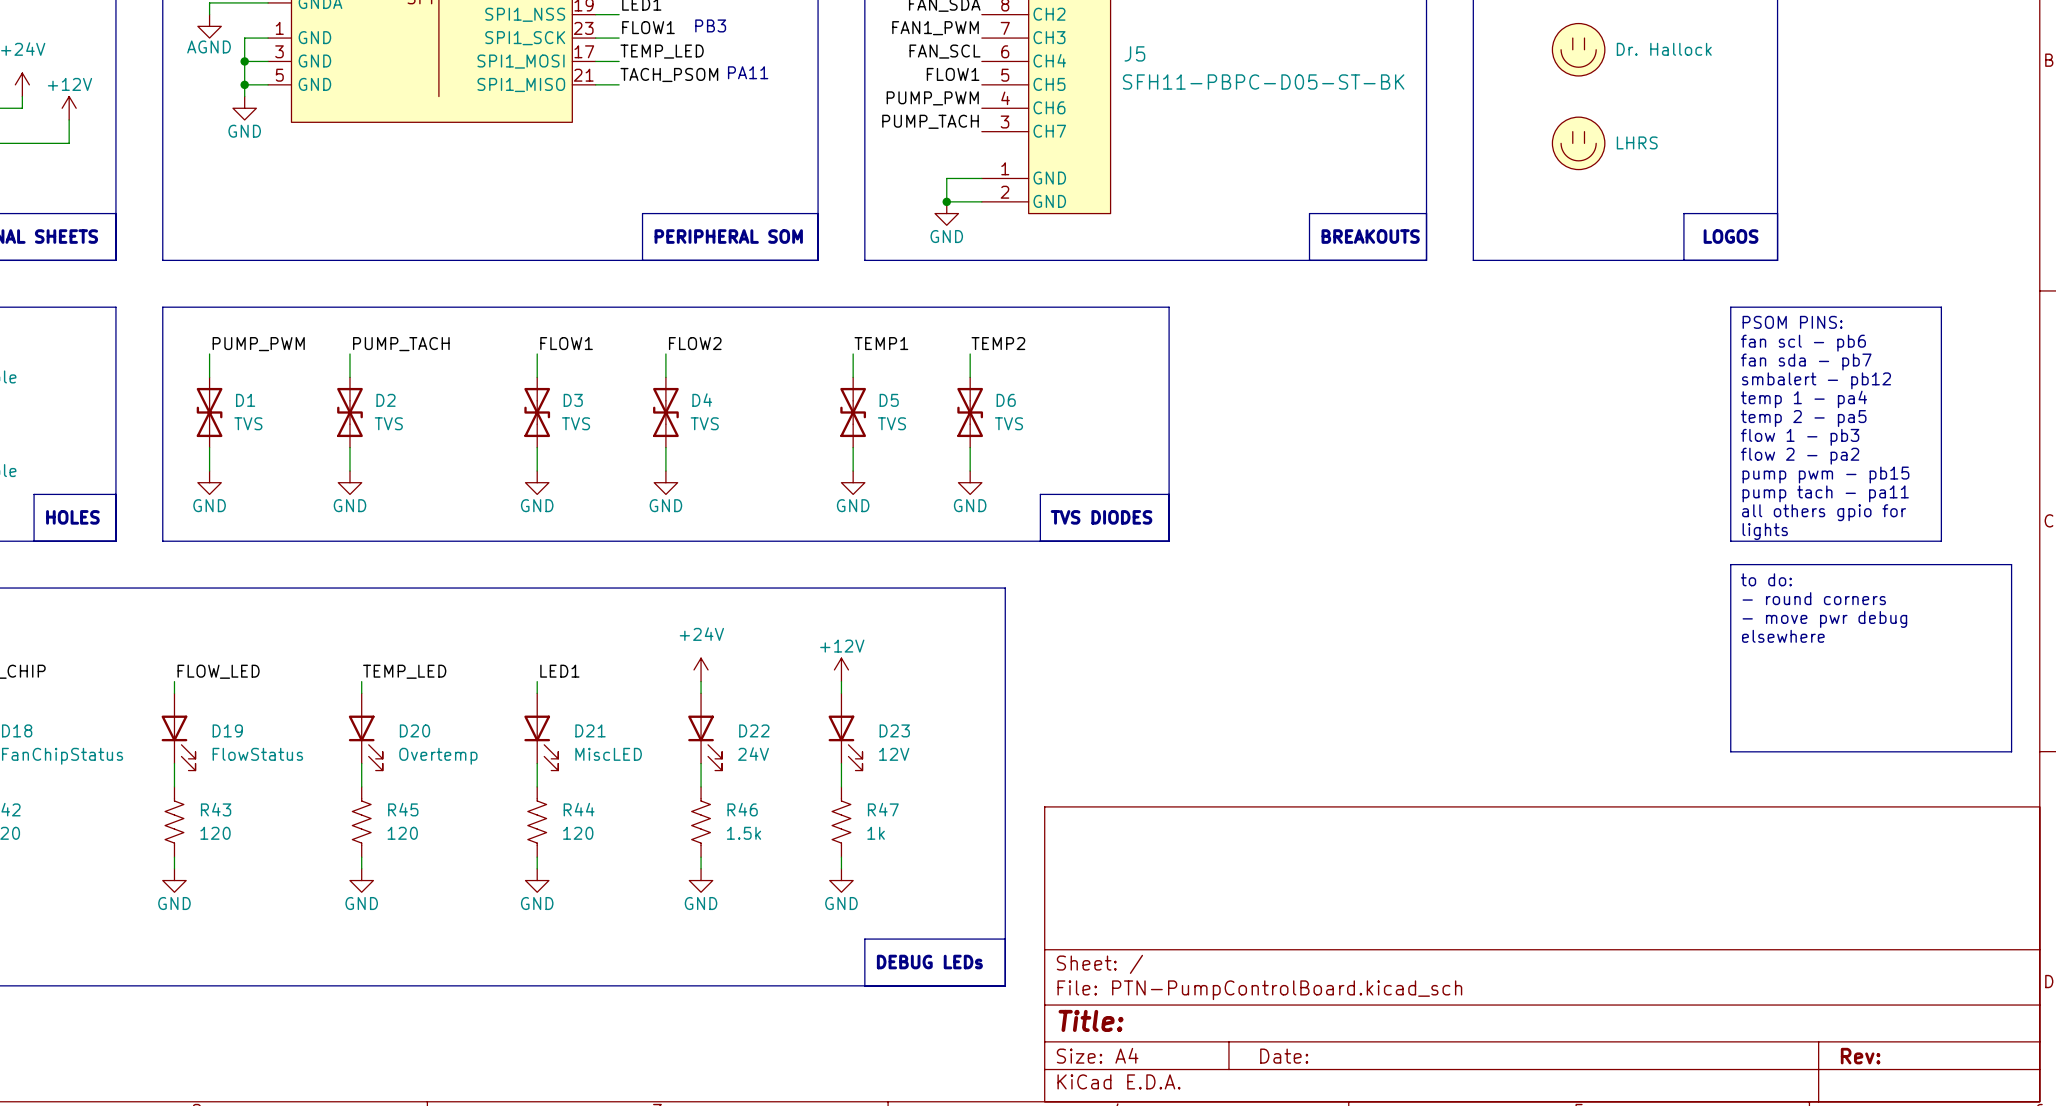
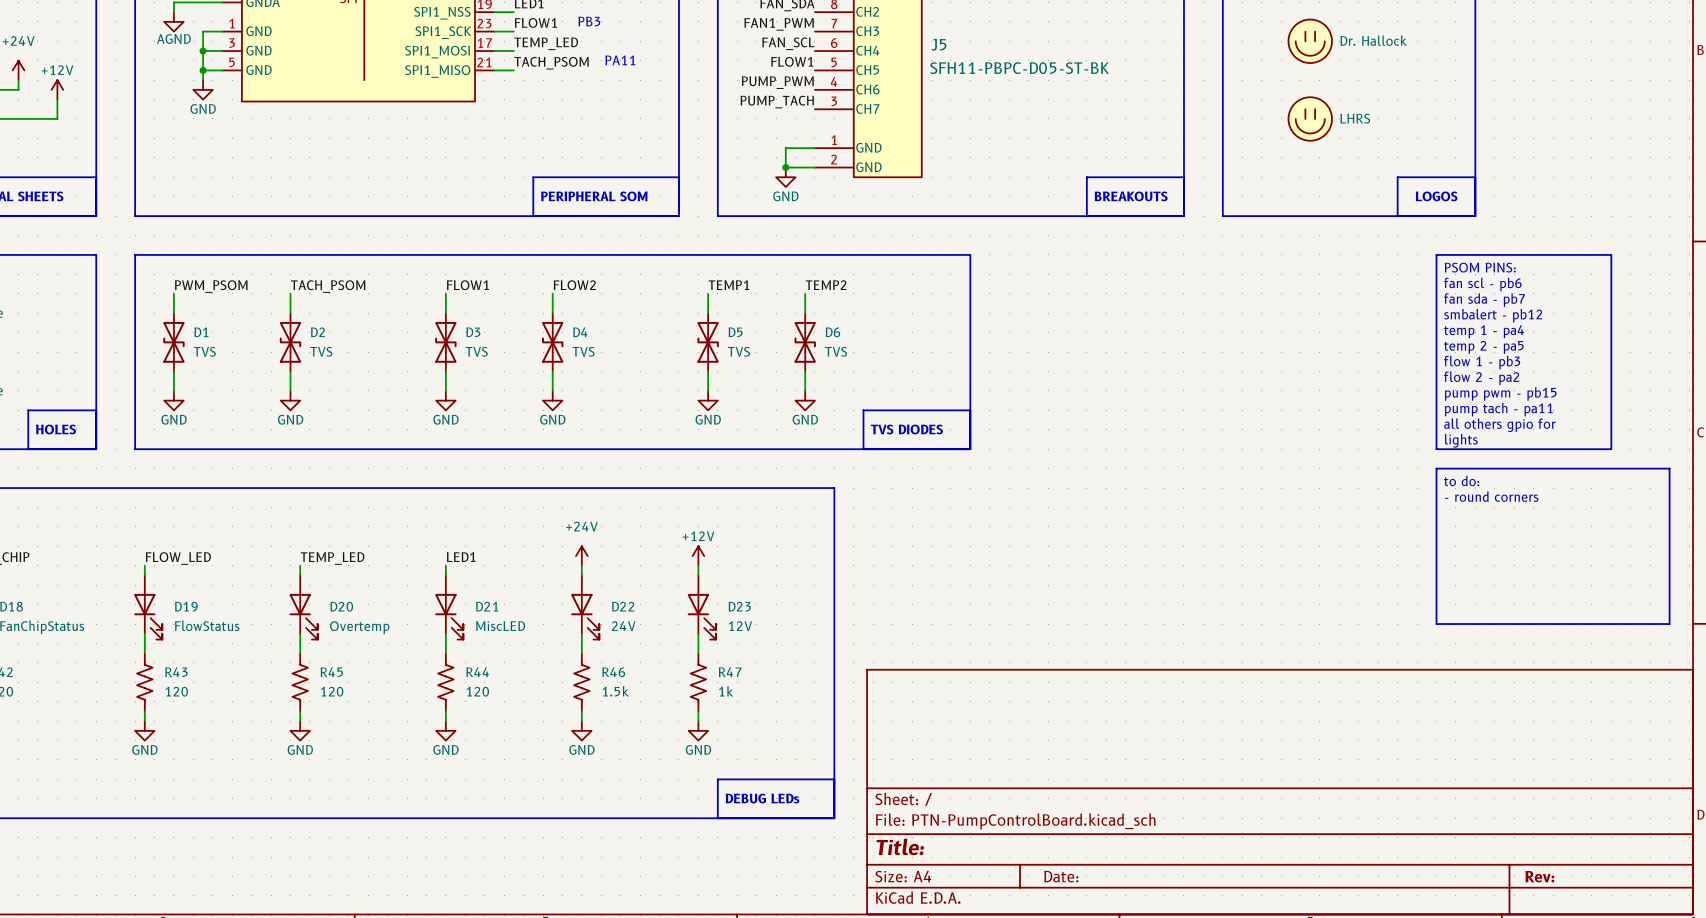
label: PUMP_PWM (258, 344) -> PWM_PSOM (211, 286)
label: PUMP_TACH (401, 344) -> TACH_PSOM (328, 286)
text: - move pwr debug (1824, 619) -> none
text: elsewhere (1783, 636) -> none

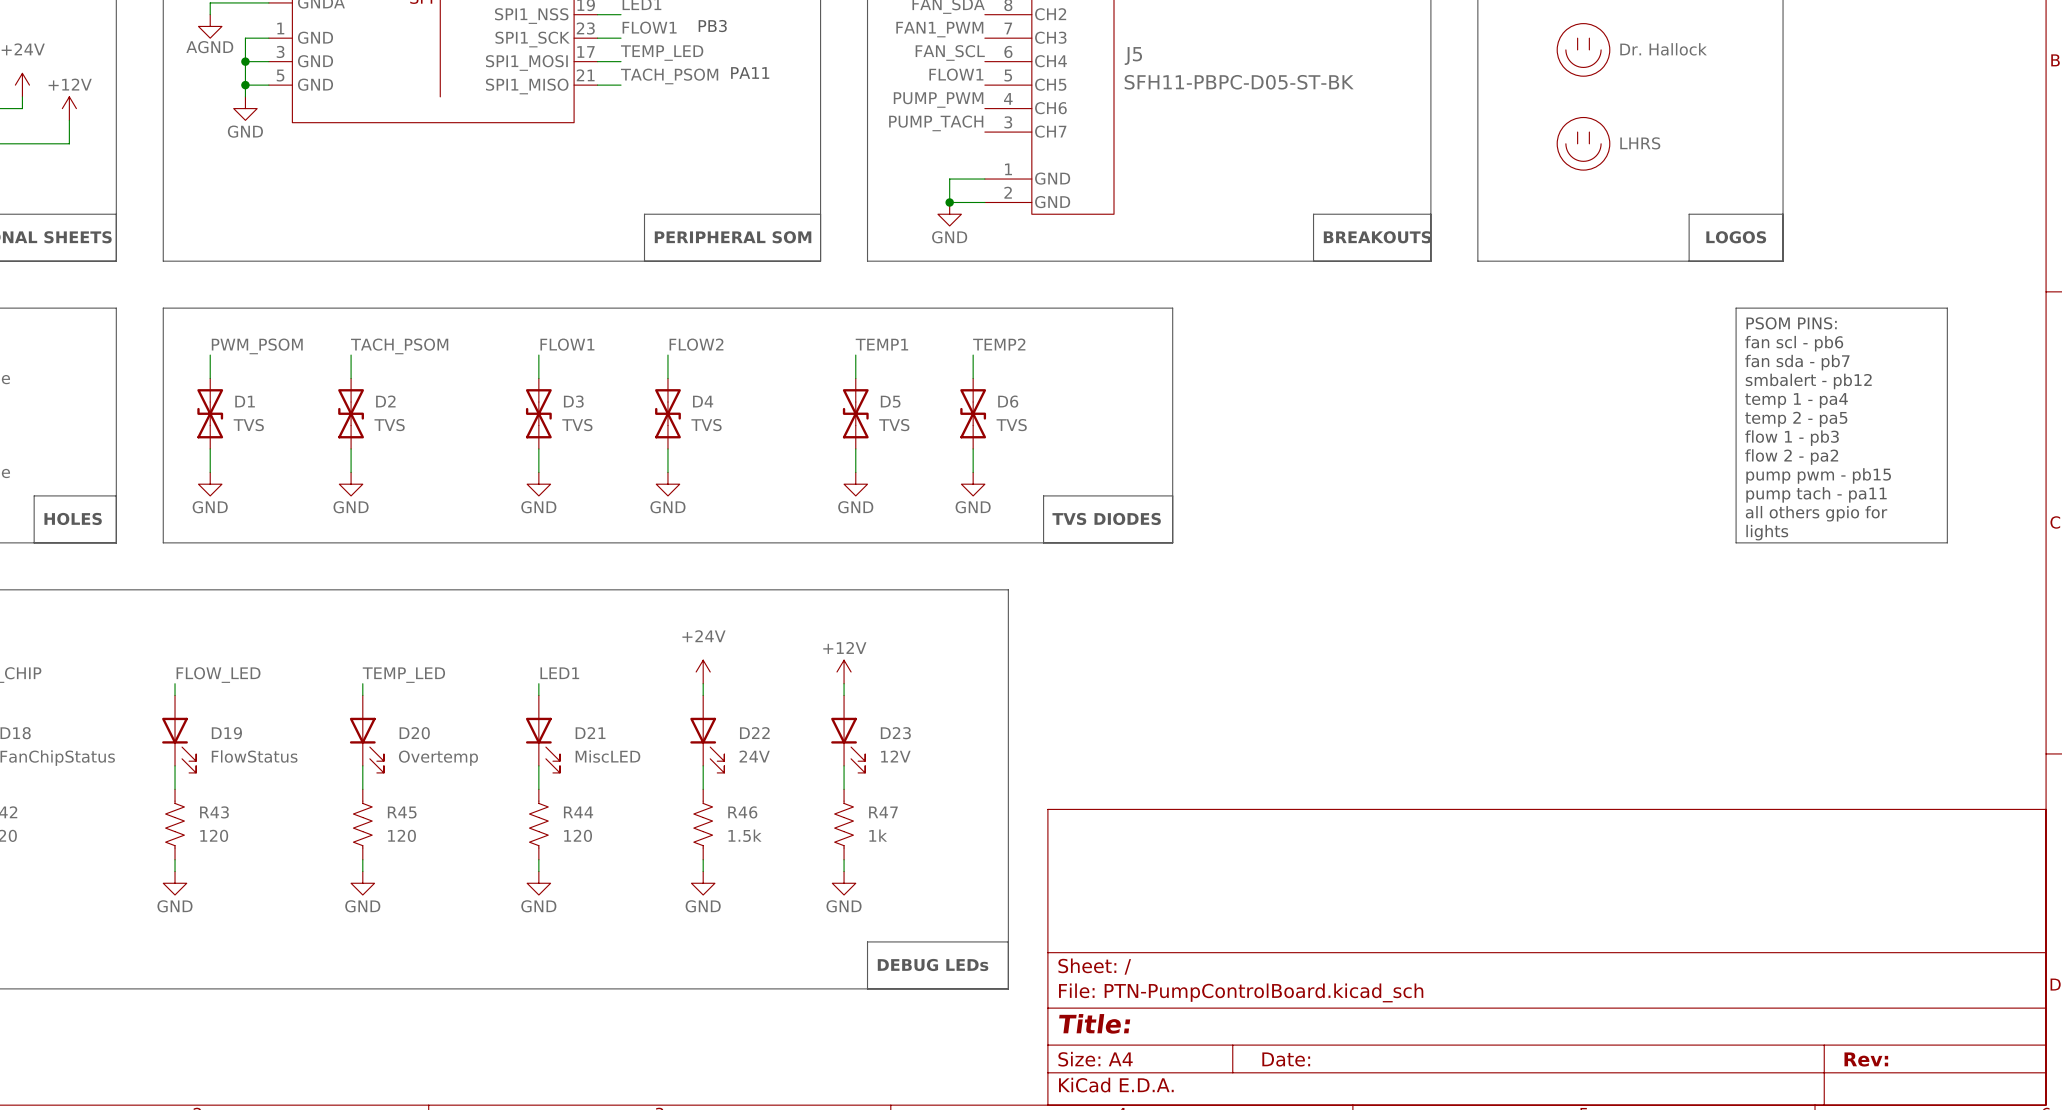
line: (1436, 468) (1669, 468) (1669, 624) (1436, 624) (1436, 468) -> none
text: to do: (1461, 480) -> none
text: - round corners (1491, 496) -> none

